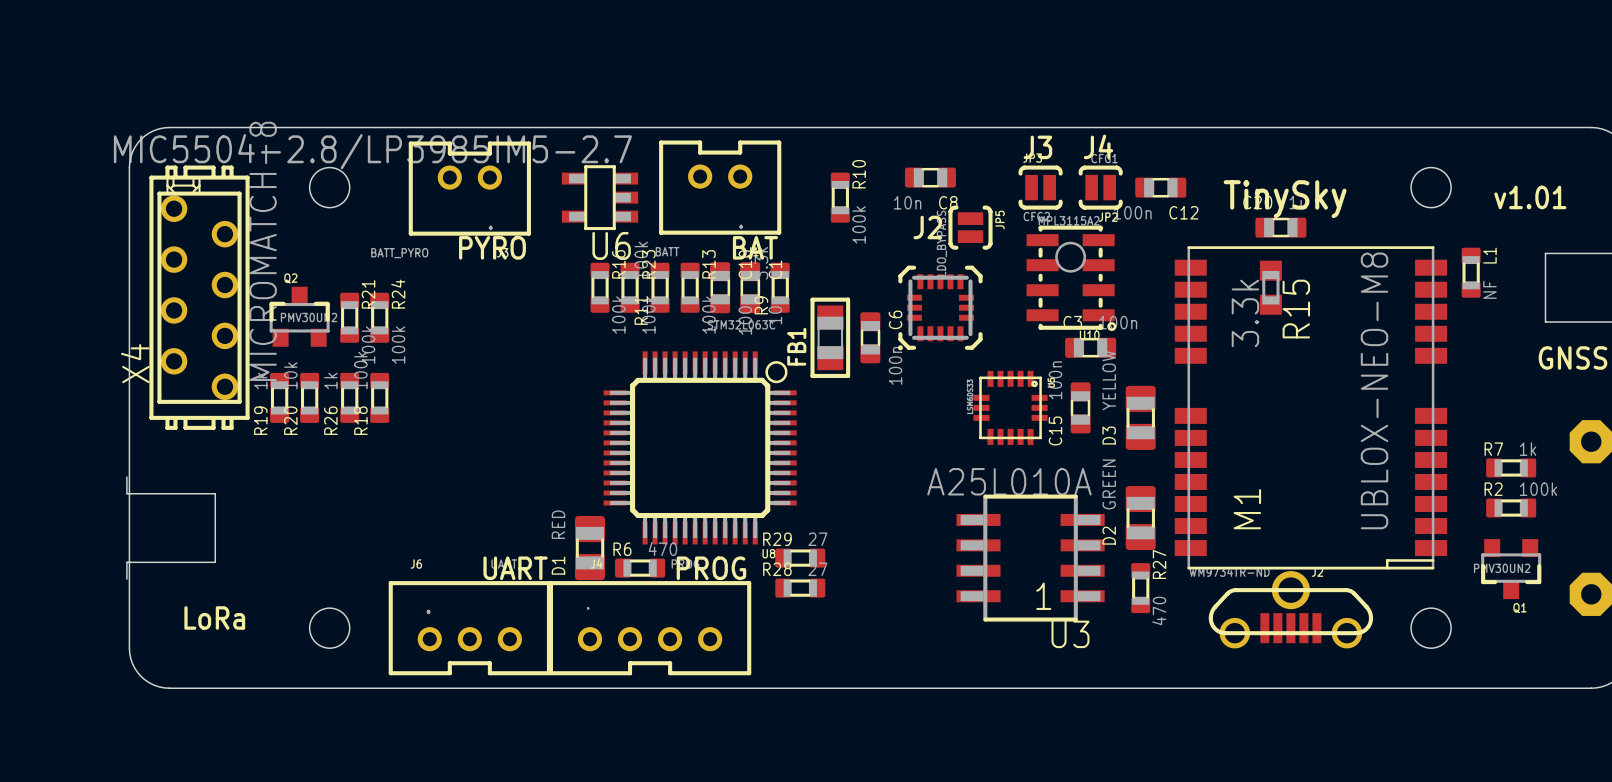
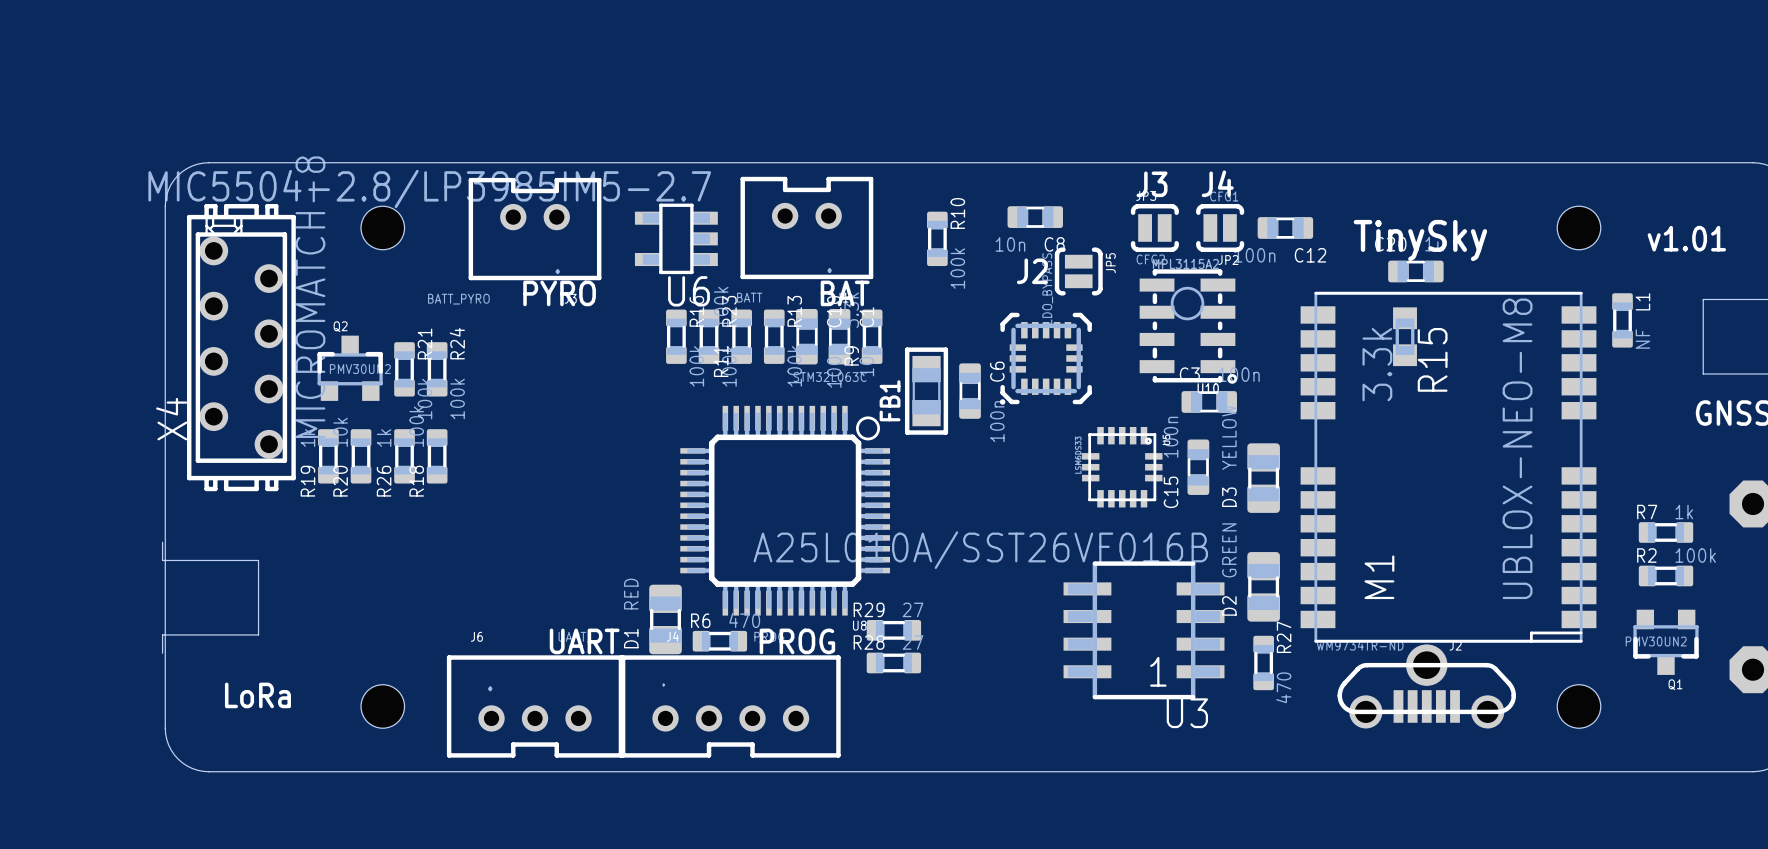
U3 value: A25L010A (1009, 481) -> A25L010A/SST26VF016B (980, 550)

